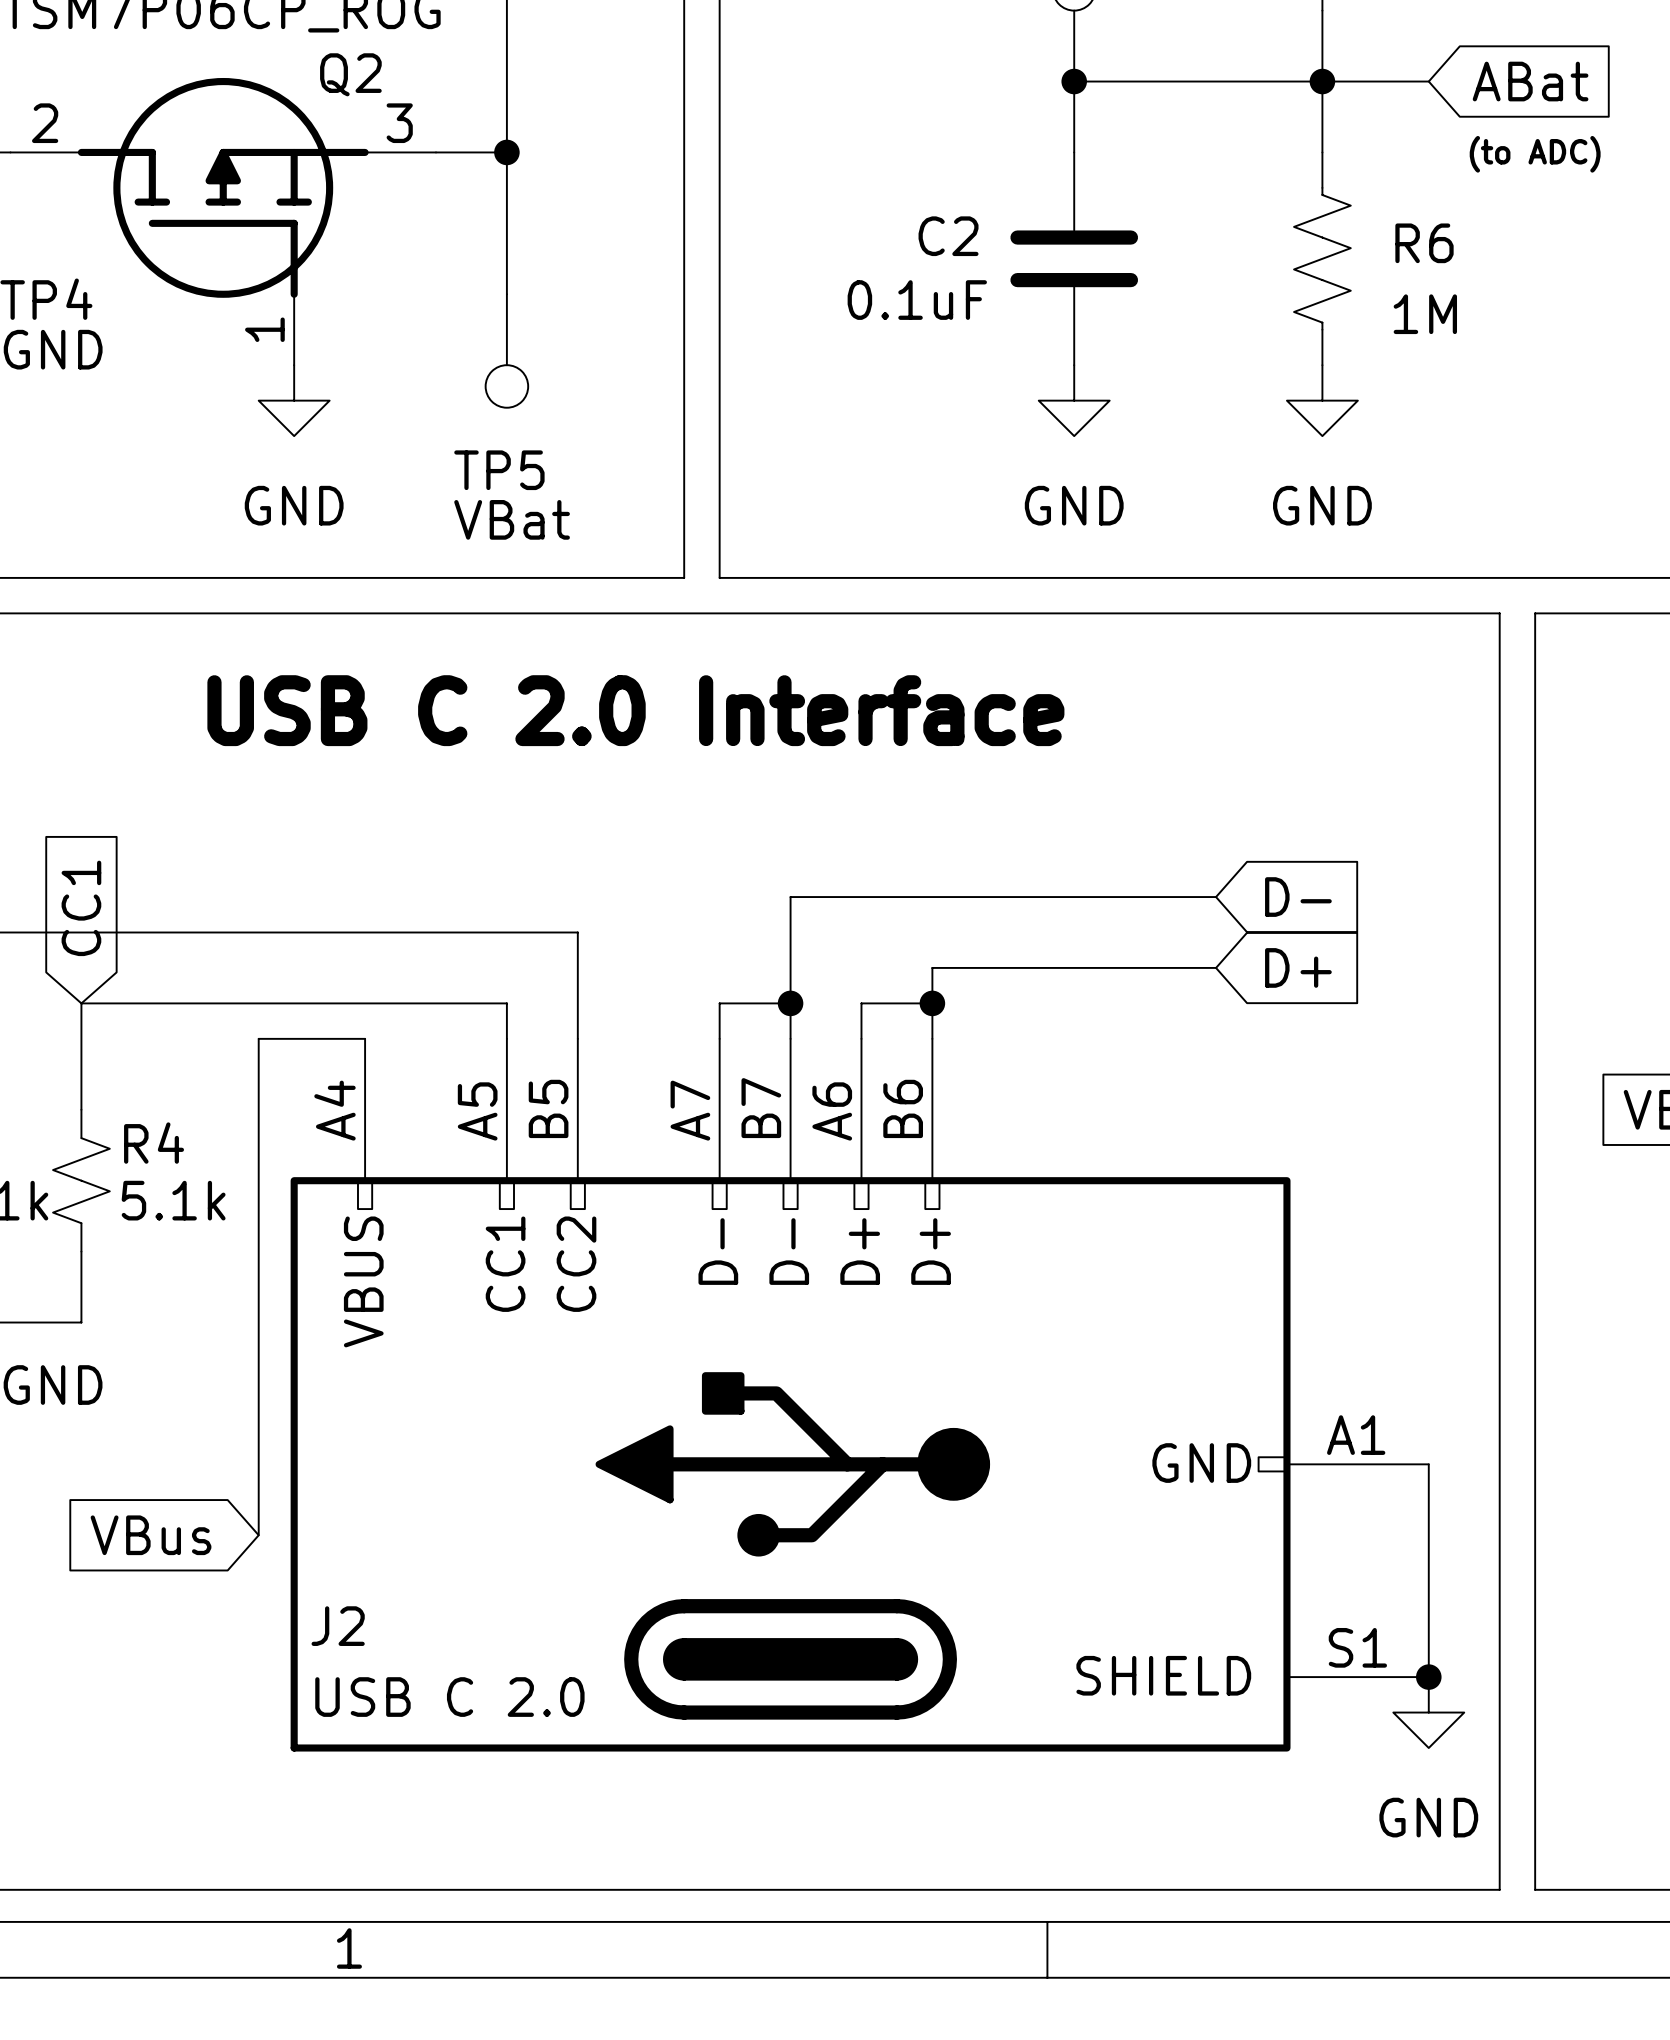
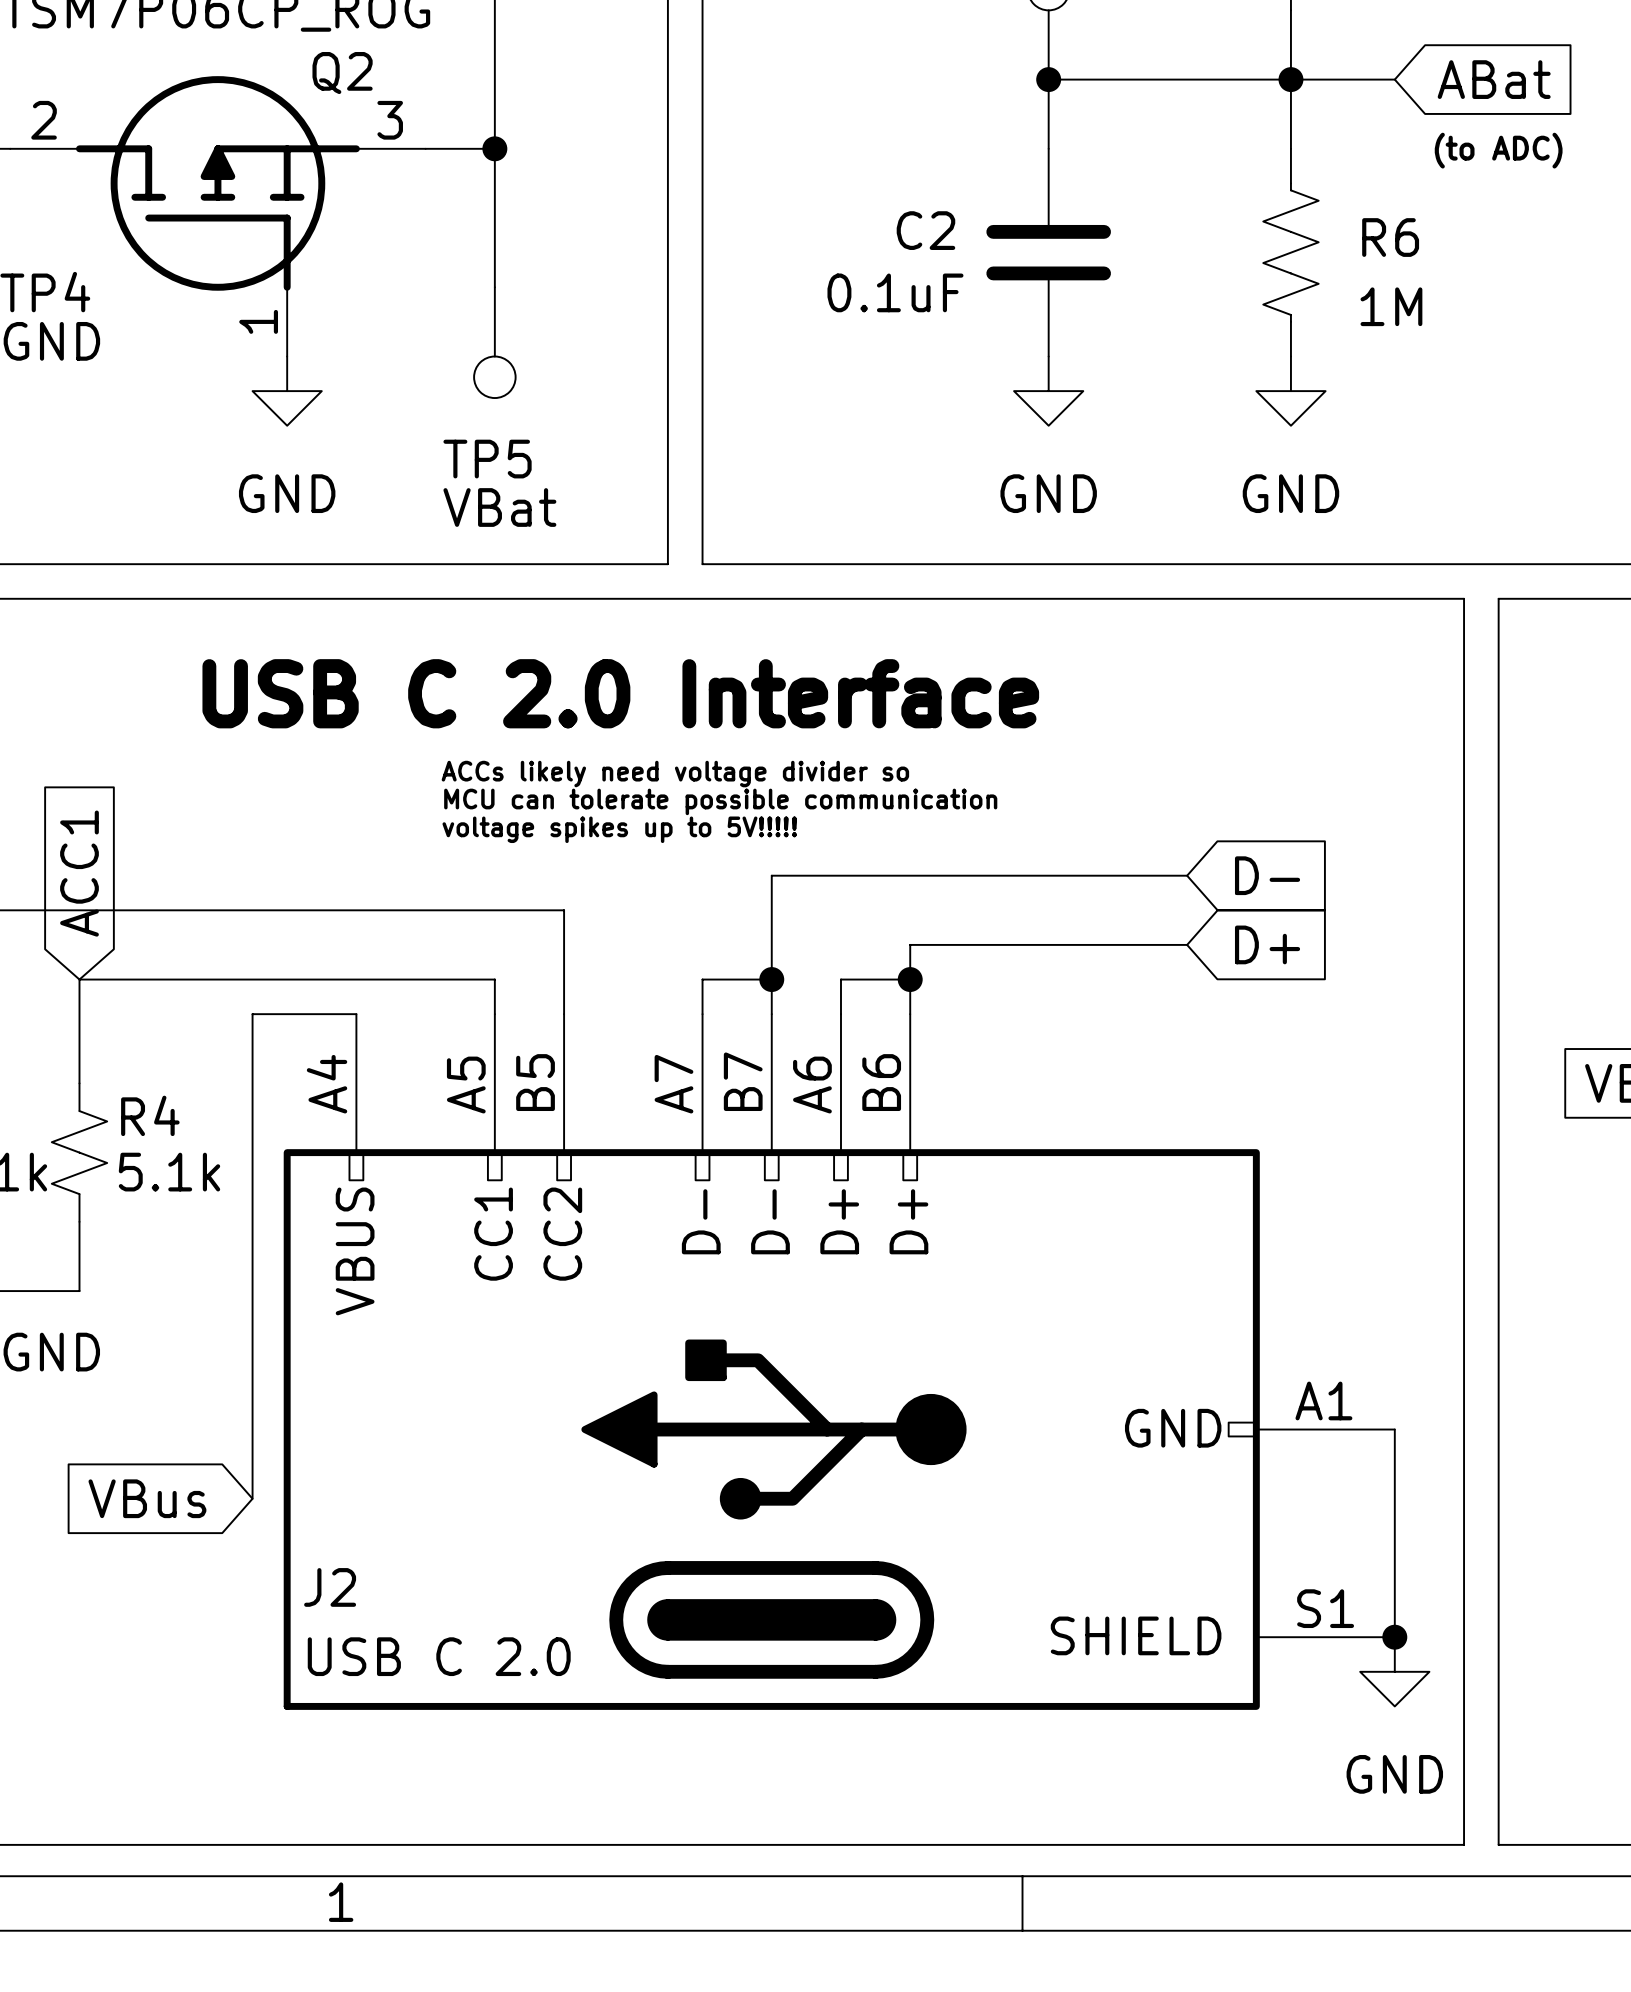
text: none -> ACCs likely need voltage divider so (675, 774)
text: none -> MCU can tolerate possible communication (720, 801)
text: none -> voltage spikes up to 5V!!!!! (619, 829)
global label: CC1 (81, 908) -> ACC1 (79, 873)

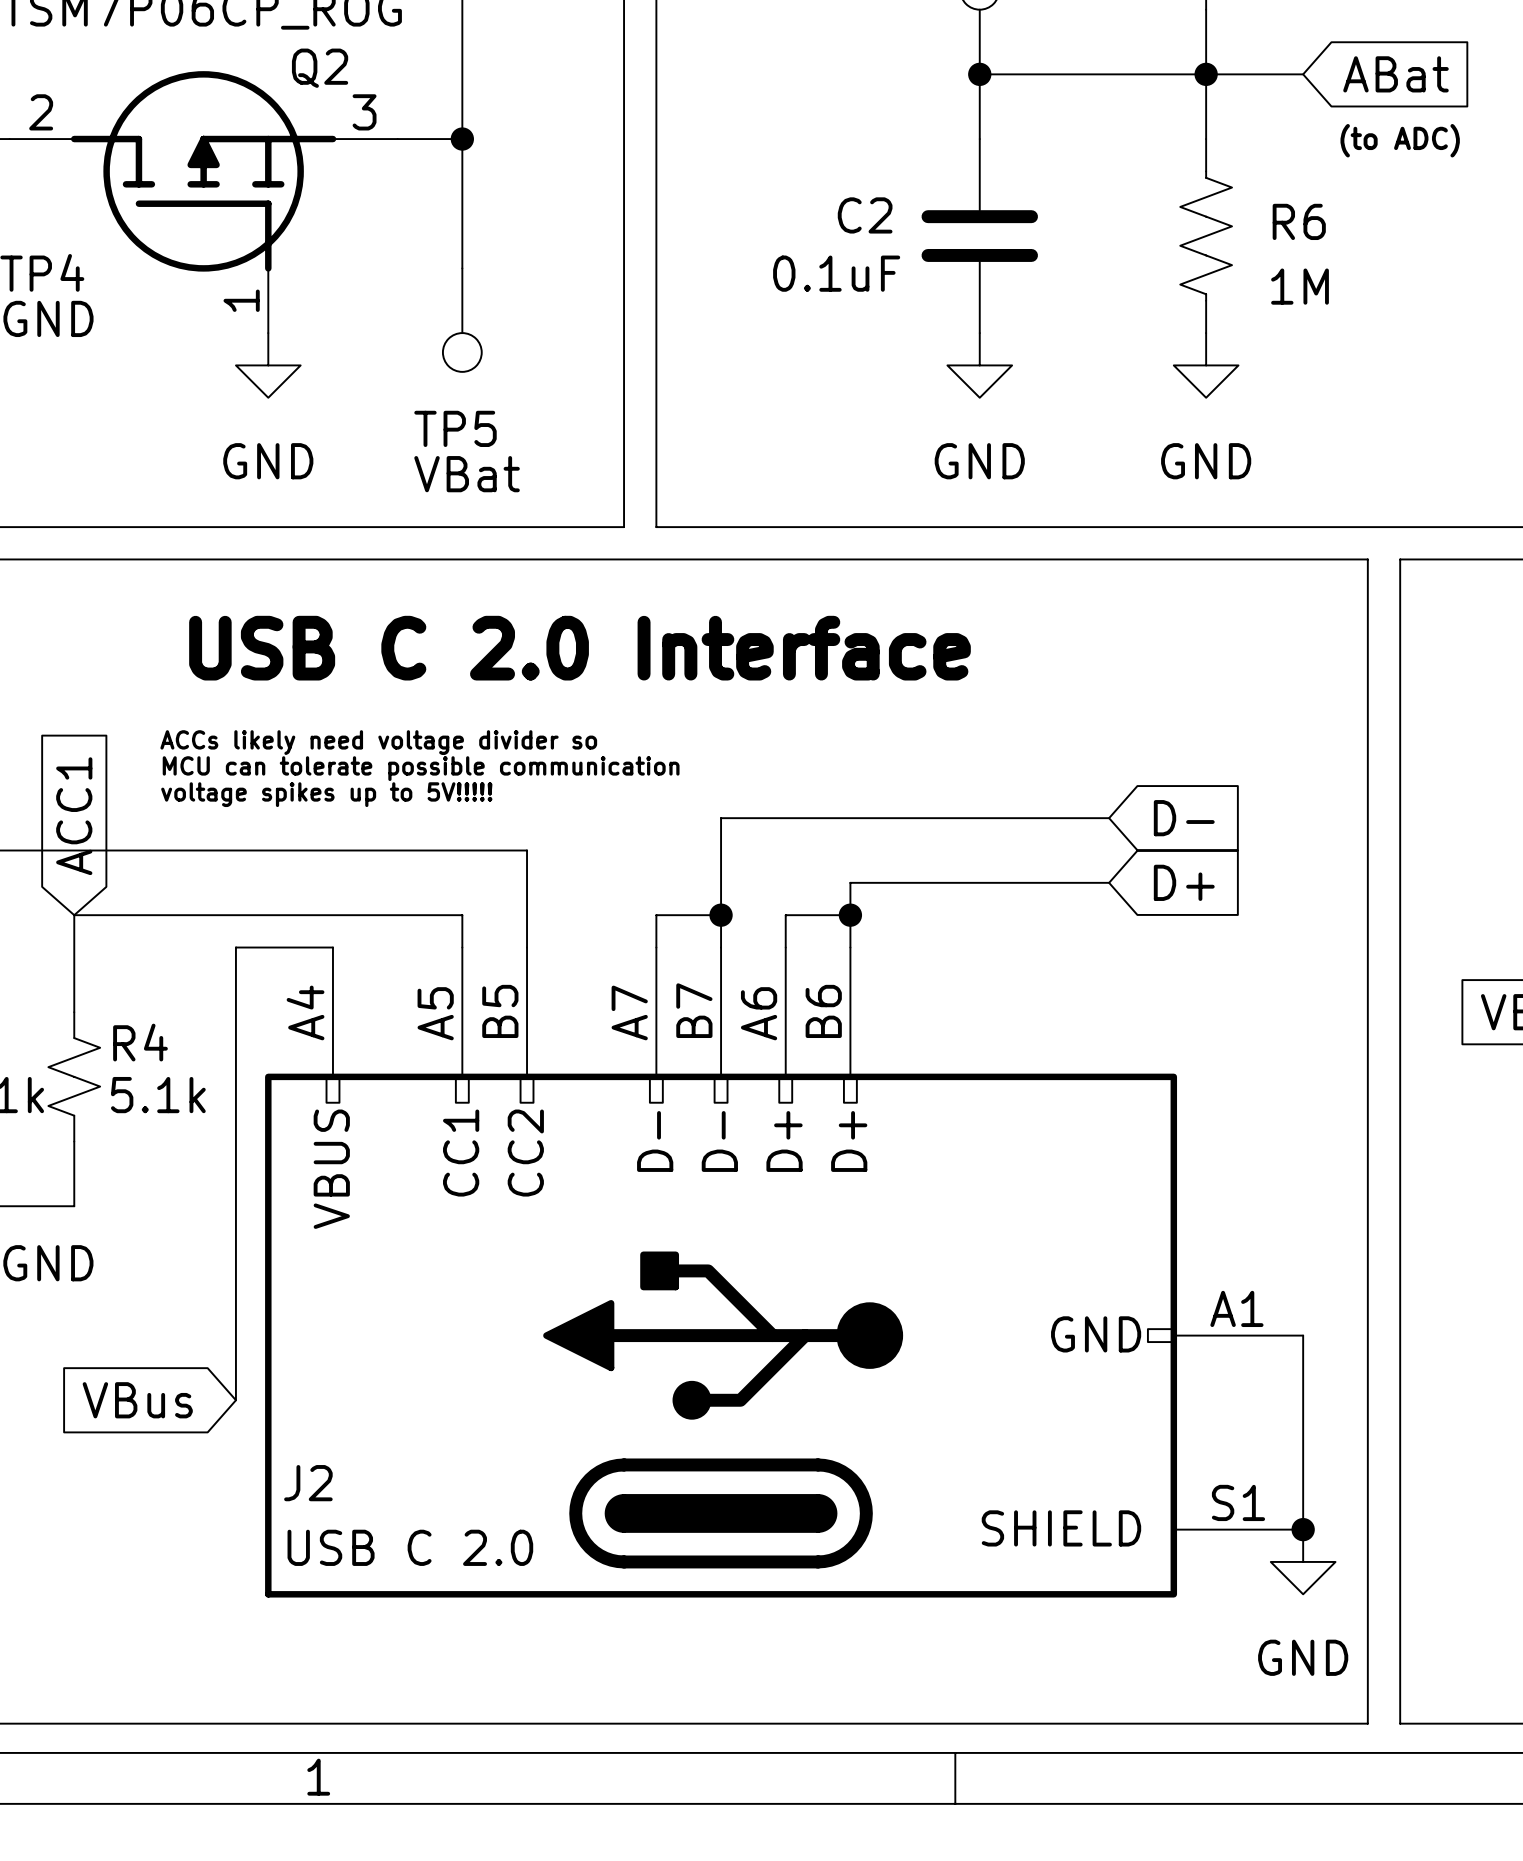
text position: ACCs likely need voltage divider so (675, 774) -> ACCs likely need voltage divider so (378, 742)
text position: MCU can tolerate possible communication (720, 801) -> MCU can tolerate possible communication (421, 768)
text position: voltage spikes up to 5V!!!!! (619, 829) -> voltage spikes up to 5V!!!!! (326, 794)

